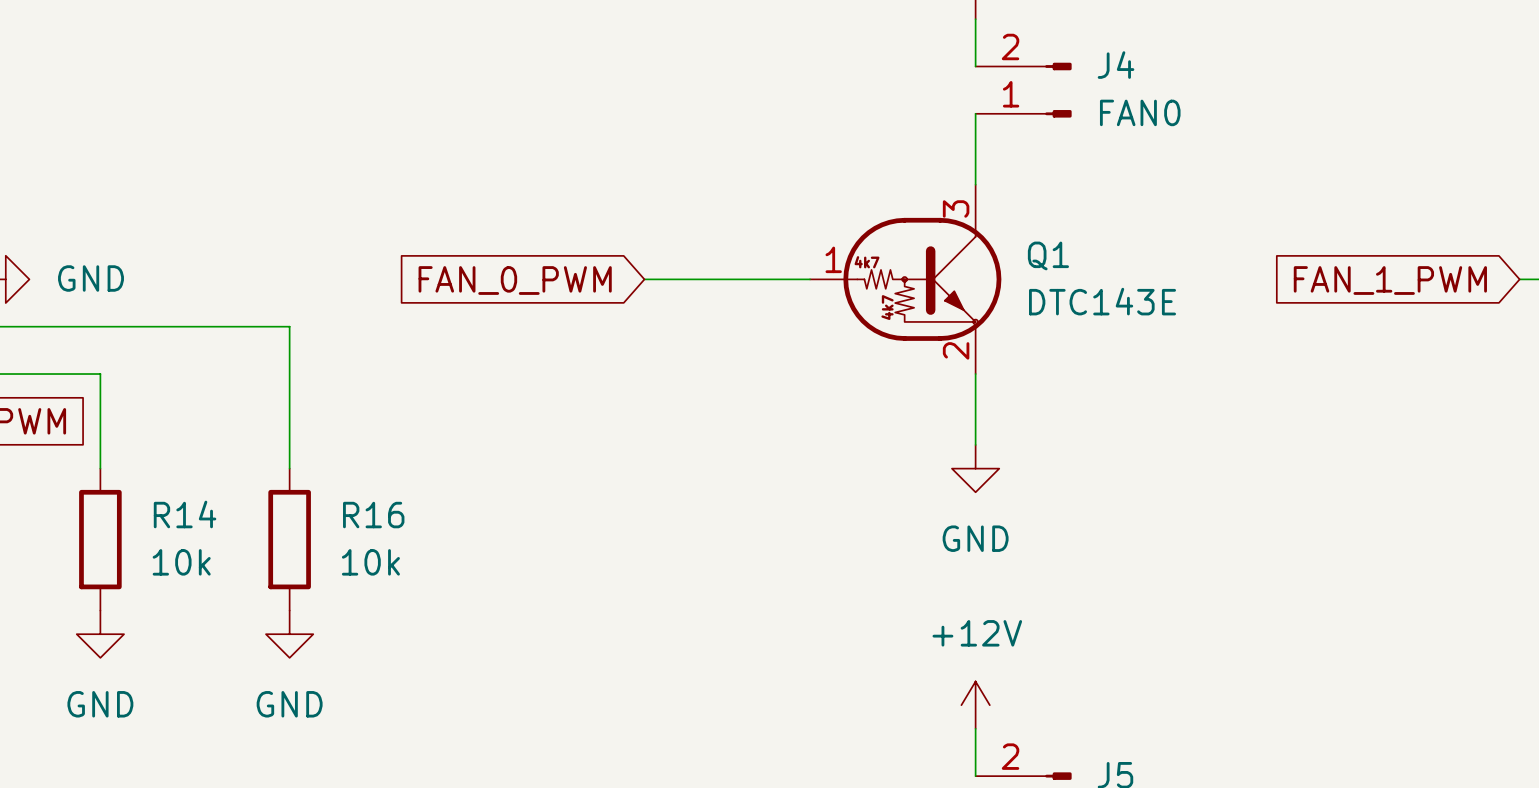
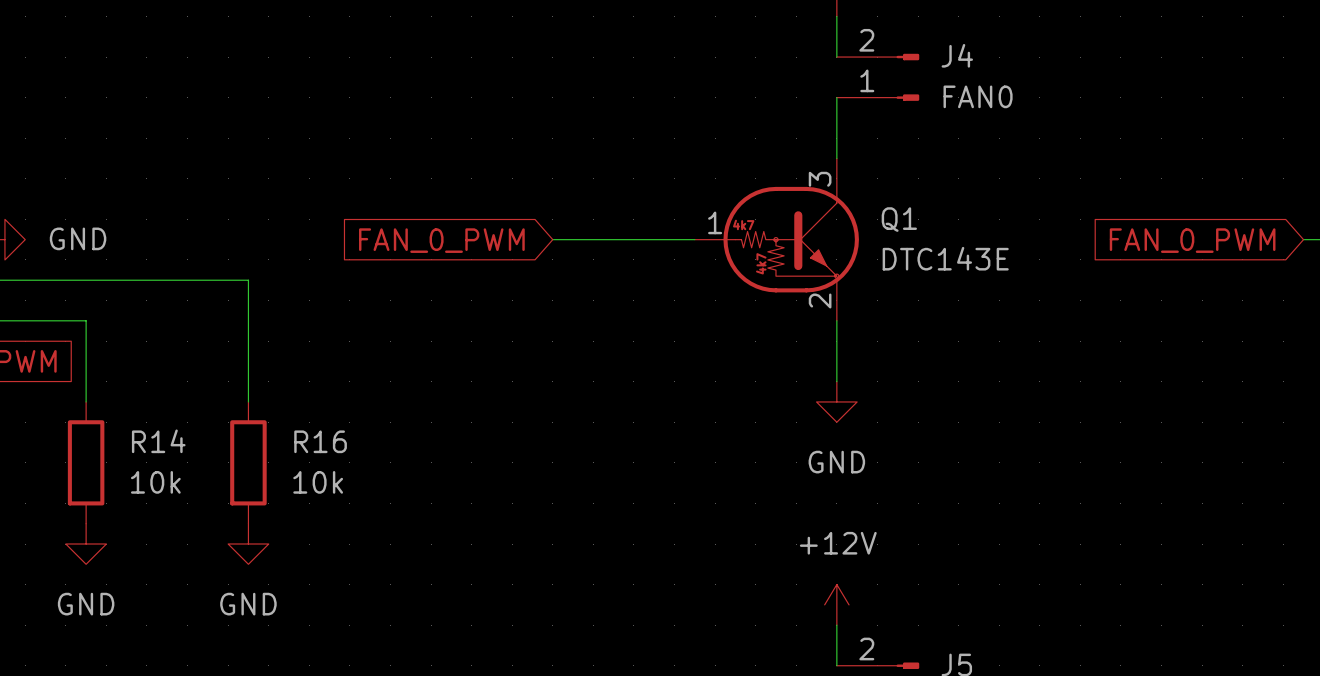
global label: FAN_1_PWM (1390, 280) -> FAN_0_PWM (1192, 240)

